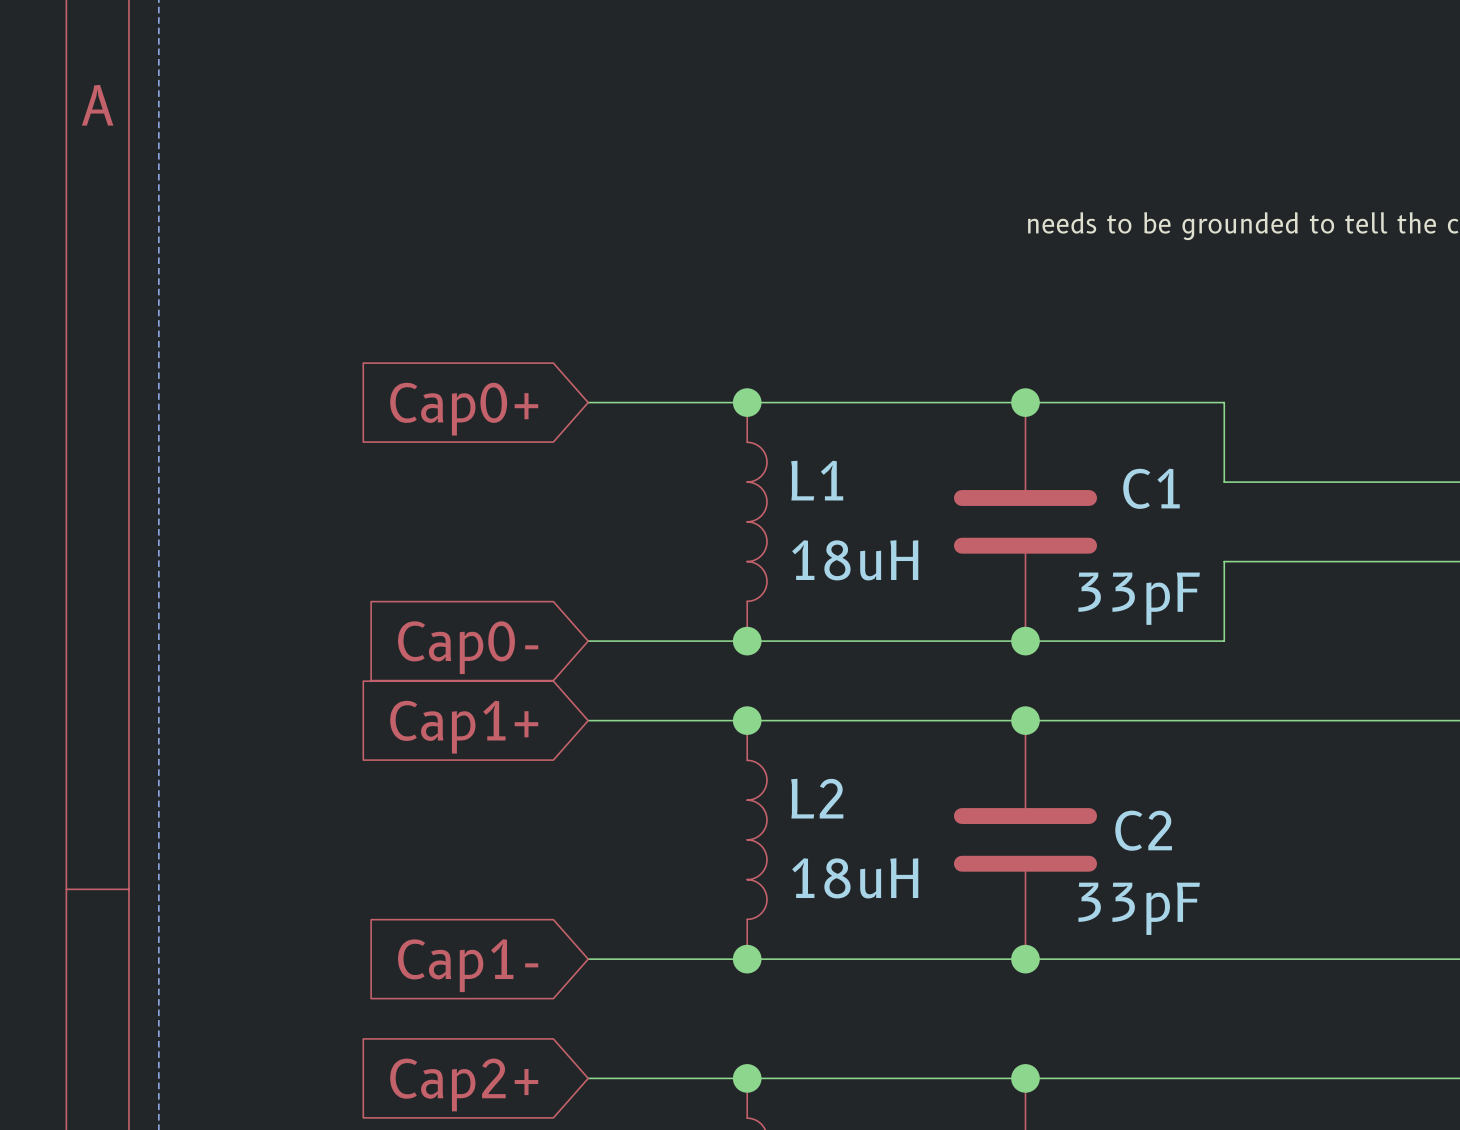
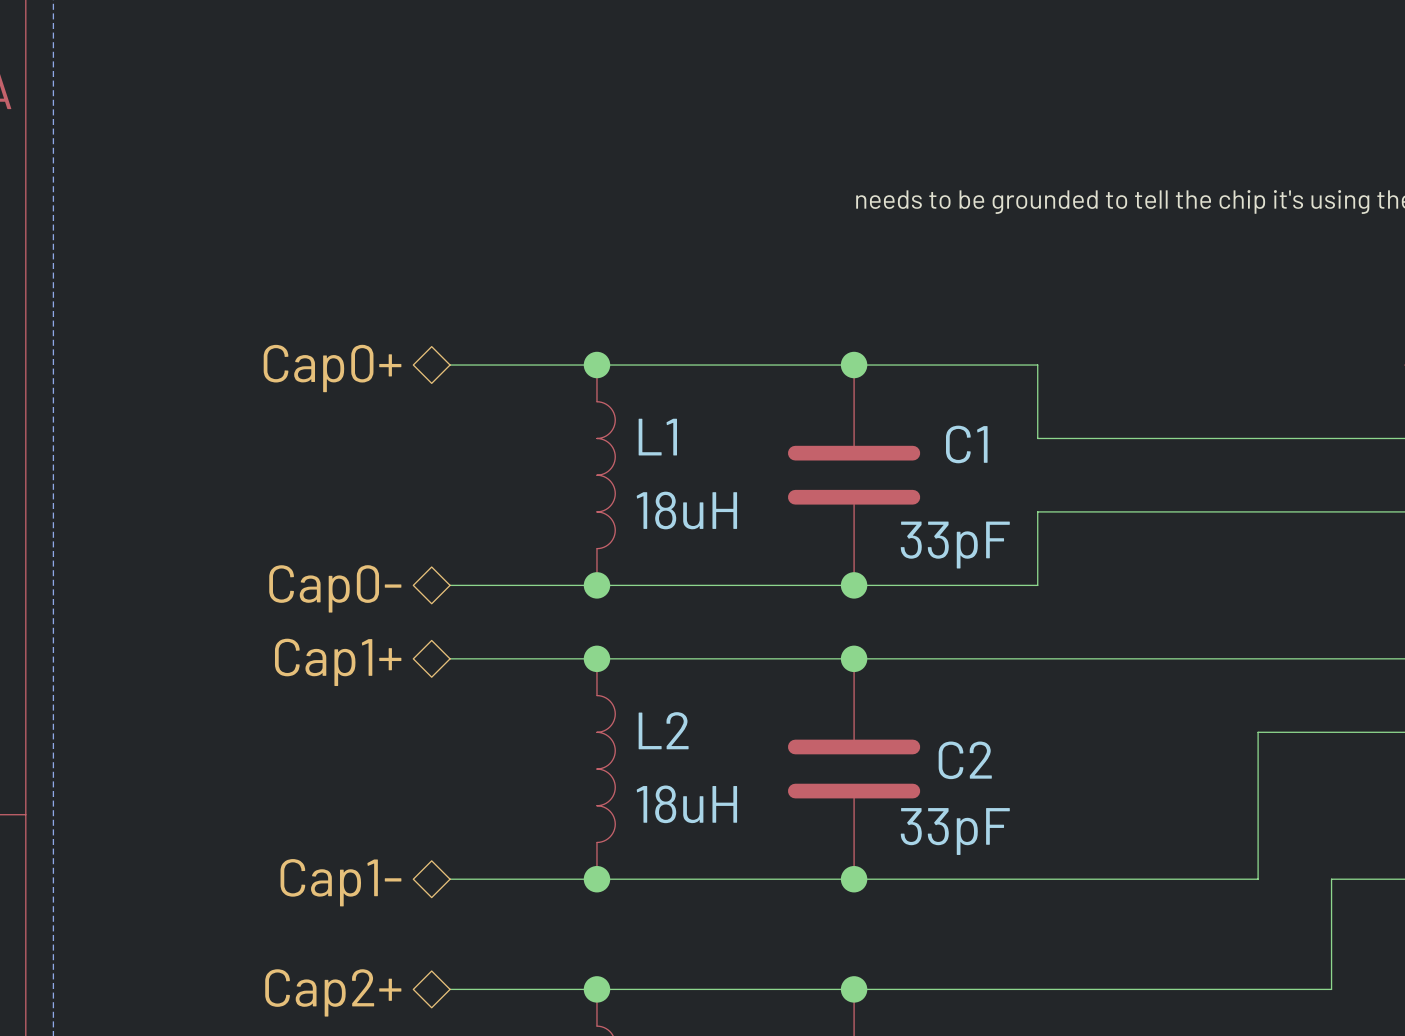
hierarchical label: none -> Cap0+ (332, 368)
global label: Cap0+ (464, 409) -> none
hierarchical label: none -> Cap0- (335, 588)
global label: Cap0- (468, 647) -> none
hierarchical label: none -> Cap1+ (338, 662)
global label: Cap1+ (464, 727) -> none
hierarchical label: none -> Cap1- (340, 882)
global label: Cap1- (468, 965) -> none
hierarchical label: none -> Cap2+ (333, 992)
global label: Cap2+ (464, 1084) -> none

